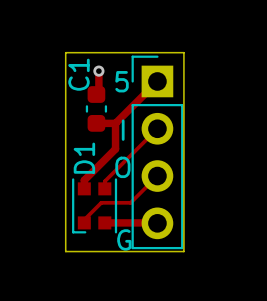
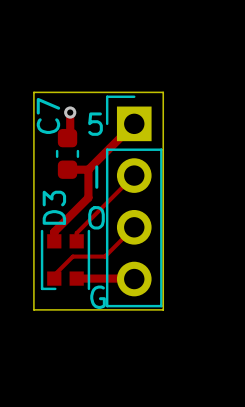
C1 name: C1 (78, 74) -> C7 (48, 115)
D1 name: D1 (84, 158) -> D3 (54, 207)

